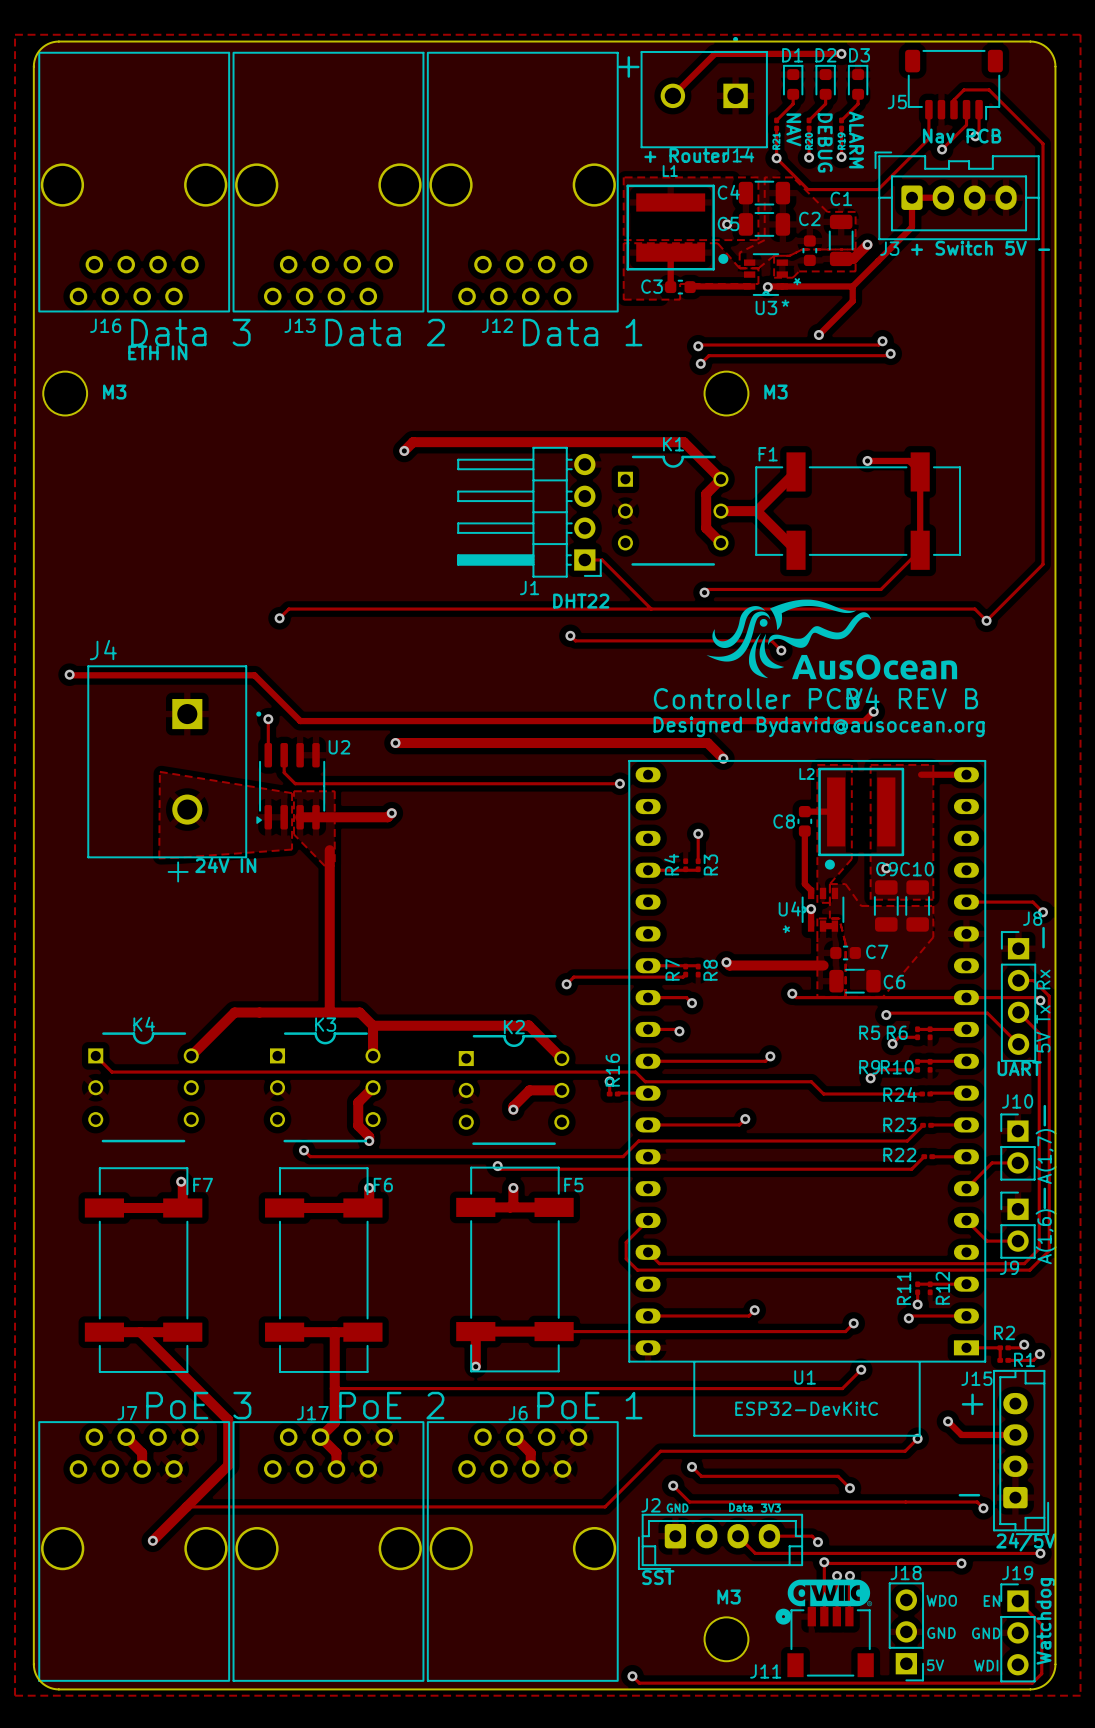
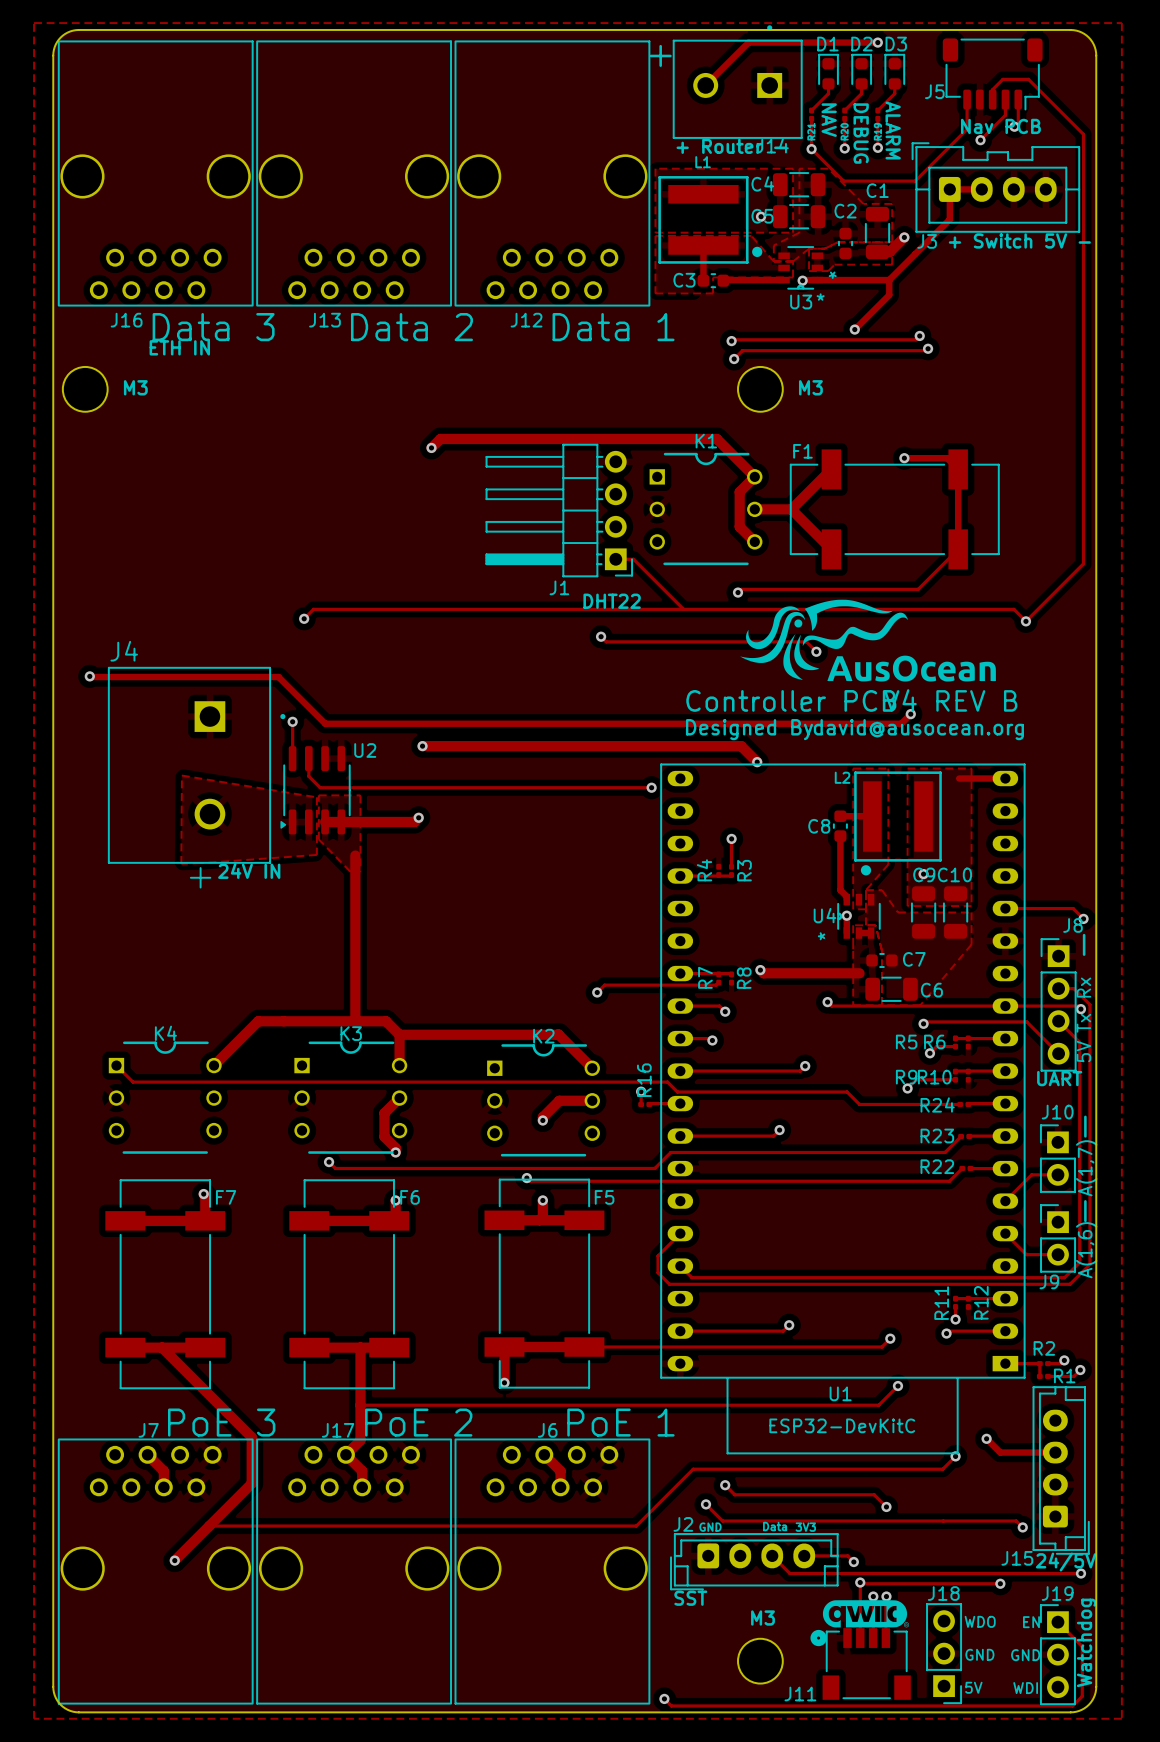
J15 name position: J15 (976, 1378) -> J15 (1017, 1558)
text: + (972, 1404) -> none
text: - (969, 1495) -> none

